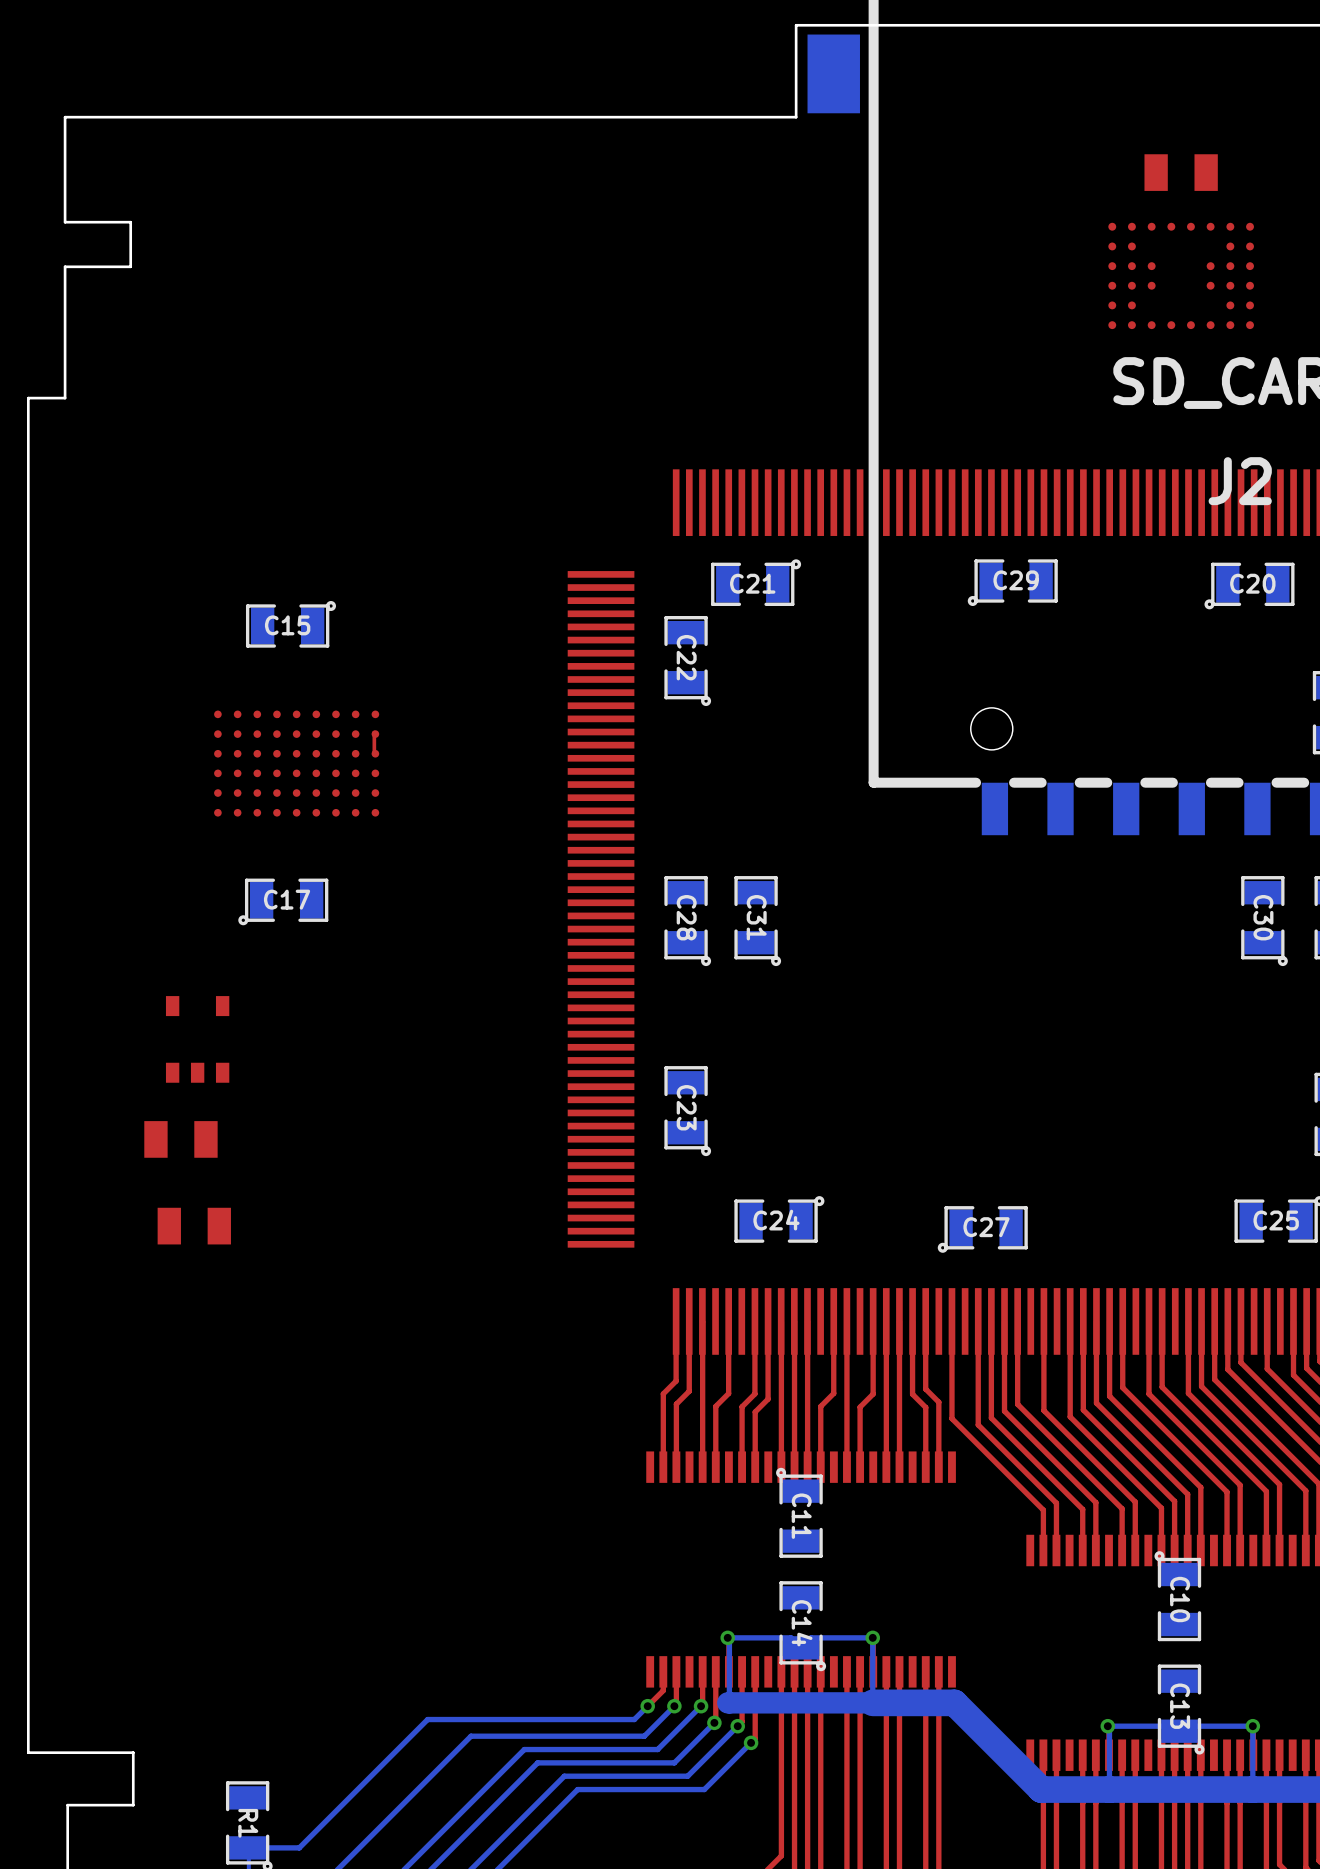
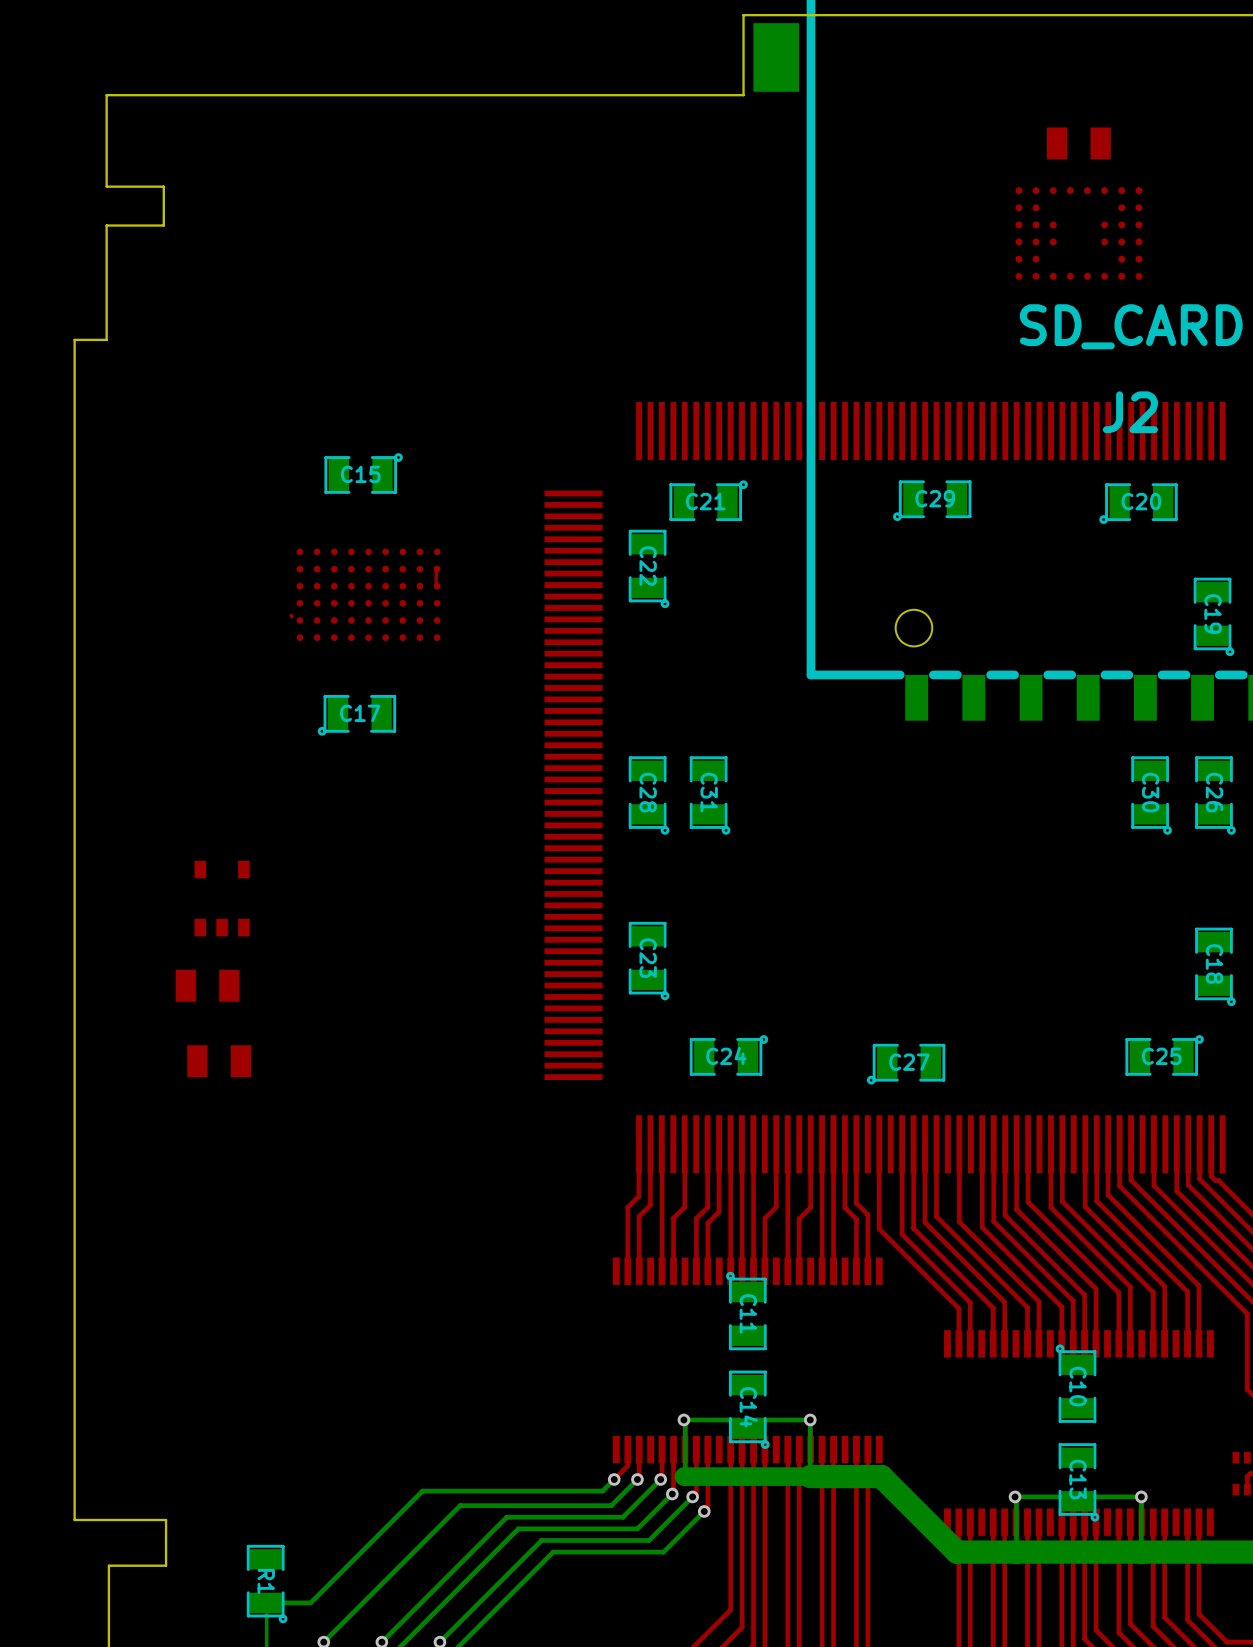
C15 position: (290, 624) -> (363, 473)
top track: (374, 732) (374, 752) -> (436, 567) (436, 585)
part position: (296, 763) -> (368, 594)
C17 position: (283, 901) -> (356, 715)

